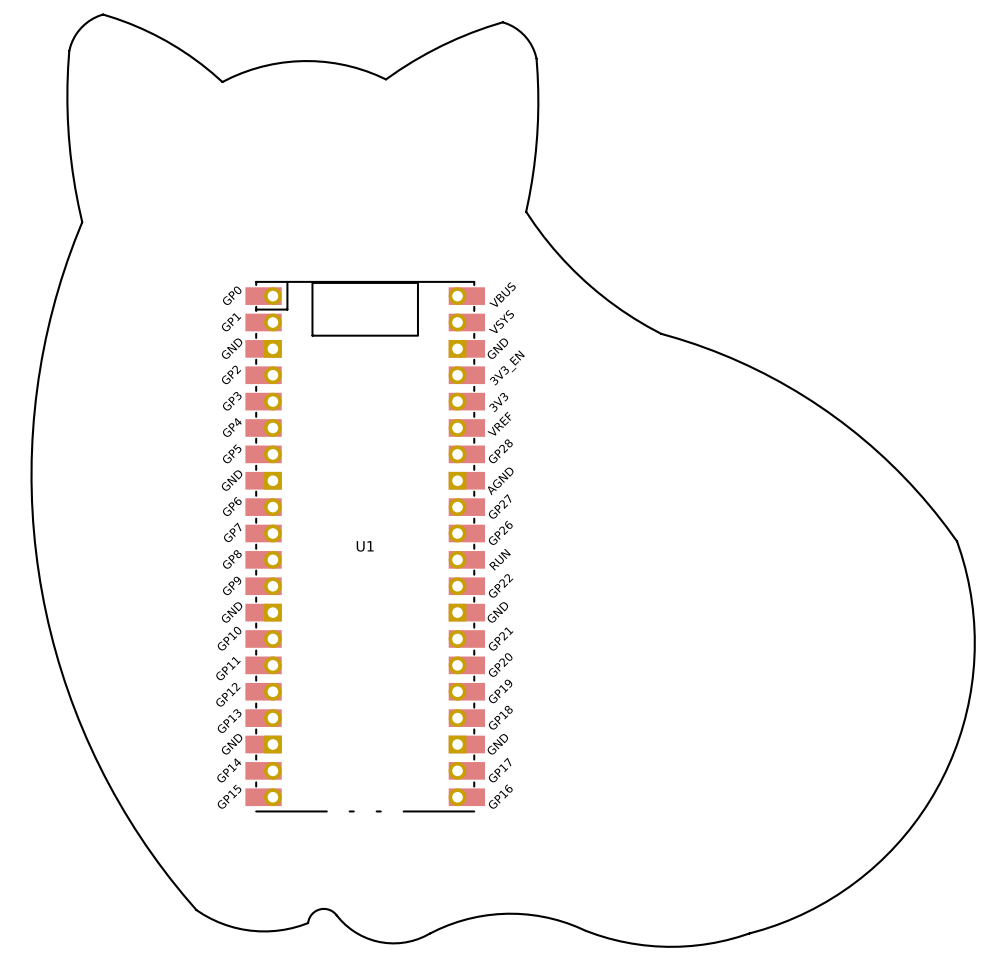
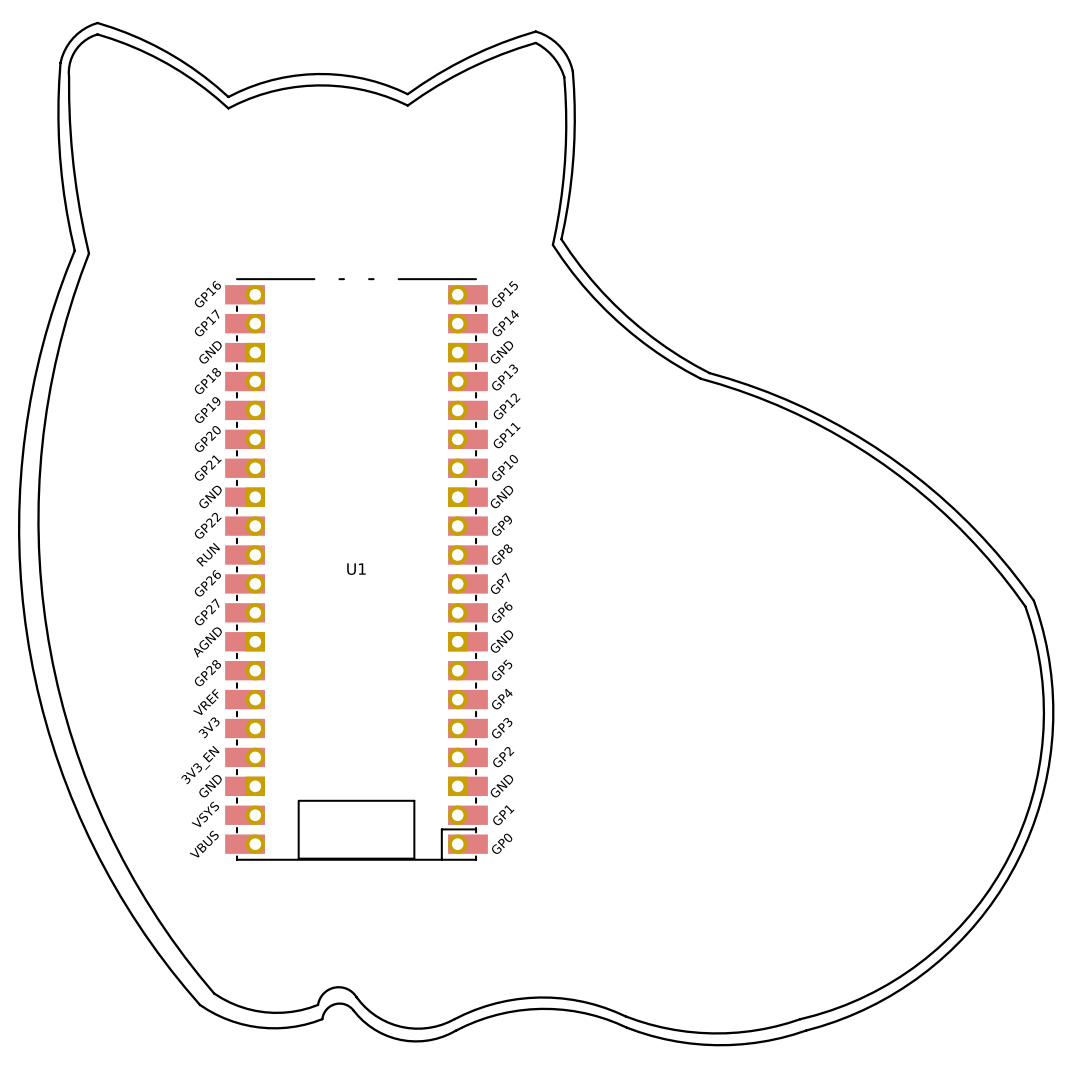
line: none -> (97, 34) (88, 37) (78, 46) (73, 54) (69, 67) (69, 121) (73, 165) (88, 253) (60, 341) (43, 432) (38, 525) (45, 618) (52, 663) (69, 731) (102, 818) (145, 899) (185, 957) (214, 993) (246, 1008) (282, 1012) (318, 1004) (325, 991) (332, 988) (342, 987) (351, 991) (365, 1007) (382, 1019) (401, 1026) (415, 1028) (442, 1024) (474, 1010) (506, 1000) (528, 998) (561, 998) (594, 1004) (637, 1020) (674, 1029) (712, 1033) (738, 1032) (788, 1023) (830, 1010) (859, 999) (887, 984) (913, 967) (949, 937) (980, 902) (997, 876) (1019, 835) (1034, 790) (1042, 744) (1043, 698) (1037, 651) (1025, 606) (1001, 574) (960, 529) (915, 488) (883, 464) (831, 431) (795, 413) (758, 397) (700, 378) (686, 370) (630, 332) (582, 285) (552, 245) (563, 178) (566, 110) (564, 77) (559, 66) (549, 52) (535, 42) (501, 54) (453, 76) (407, 105) (363, 90) (317, 85) (271, 91) (228, 108) (193, 79) (167, 63) (126, 44) (97, 34)
U1 rotation: 0° (365, 546) -> 180° (356, 569)

